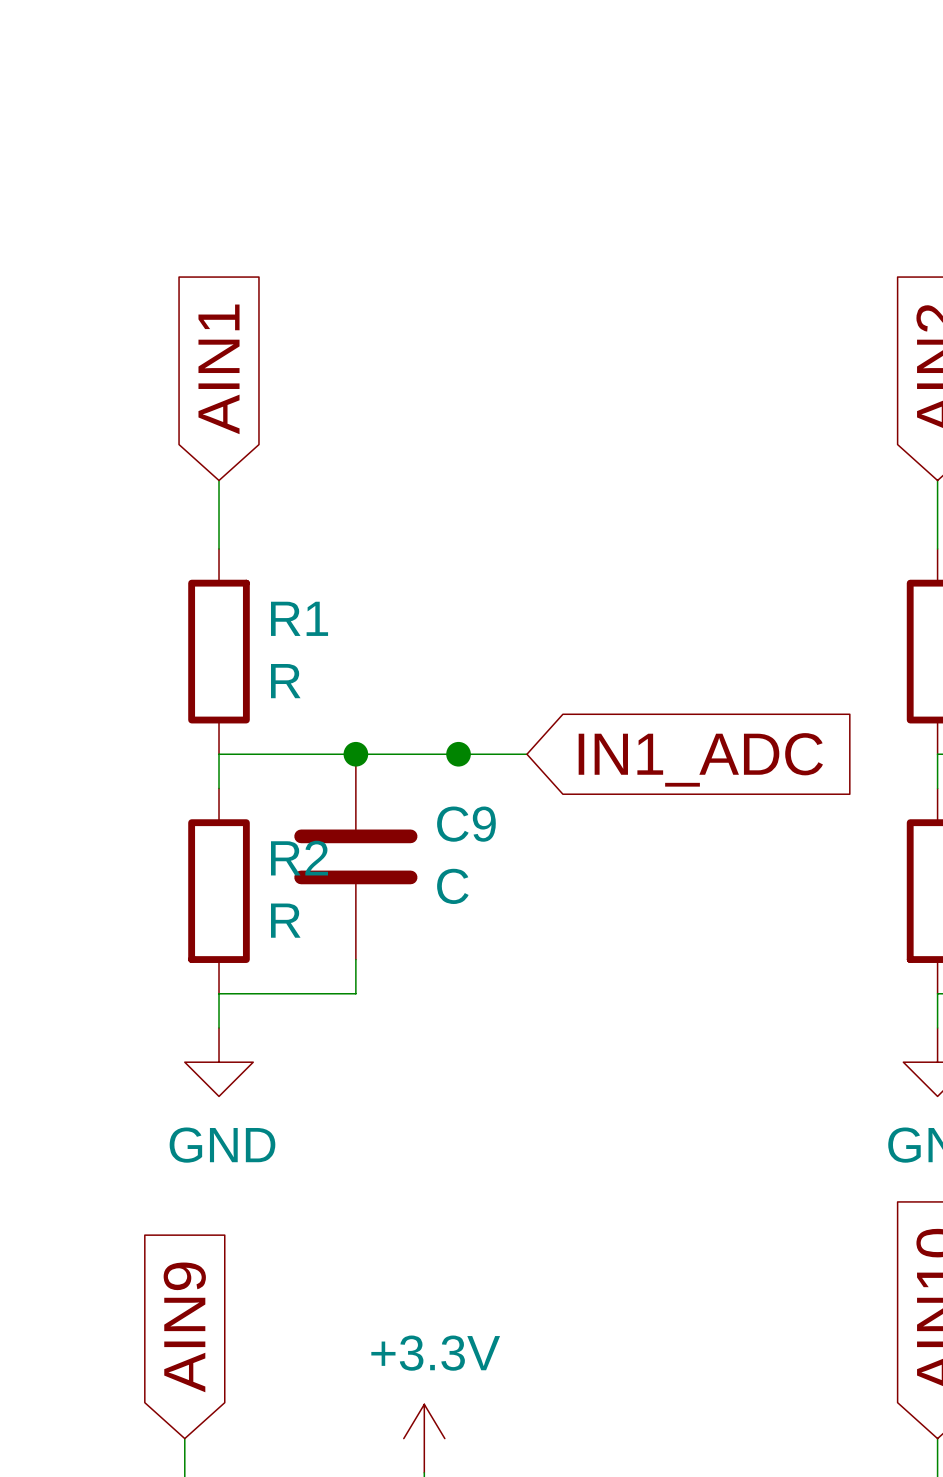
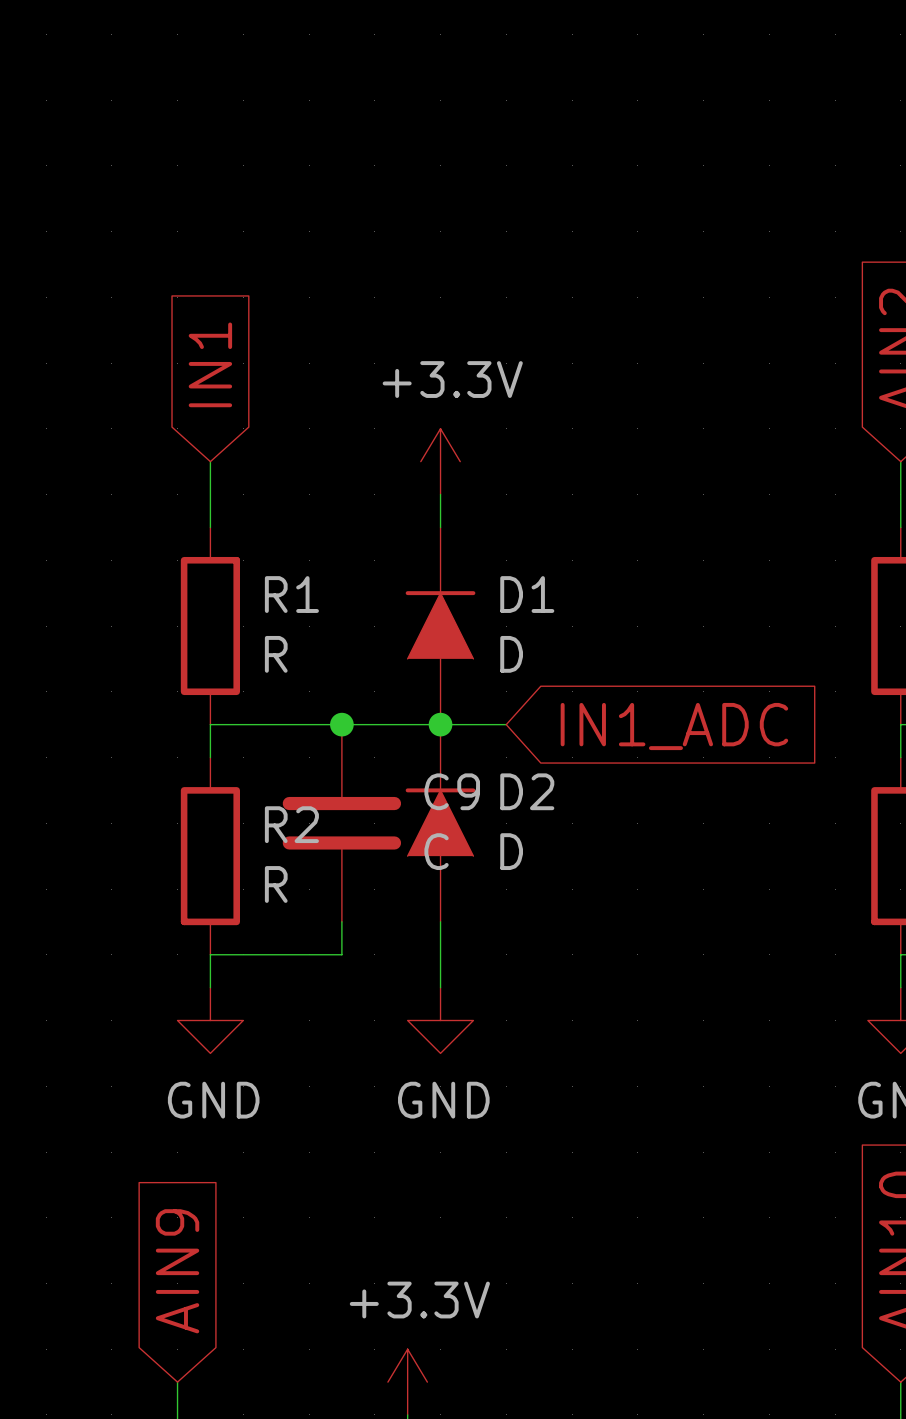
global label: AIN1 (219, 369) -> IN1 (210, 364)
power symbol: none -> +3.3V (440, 461)
wire: none -> (440, 494) (440, 527)
D1: none -> D (440, 626)
D2: none -> D (440, 823)
wire: none -> (440, 921) (440, 987)
power symbol: none -> GND (440, 1020)

